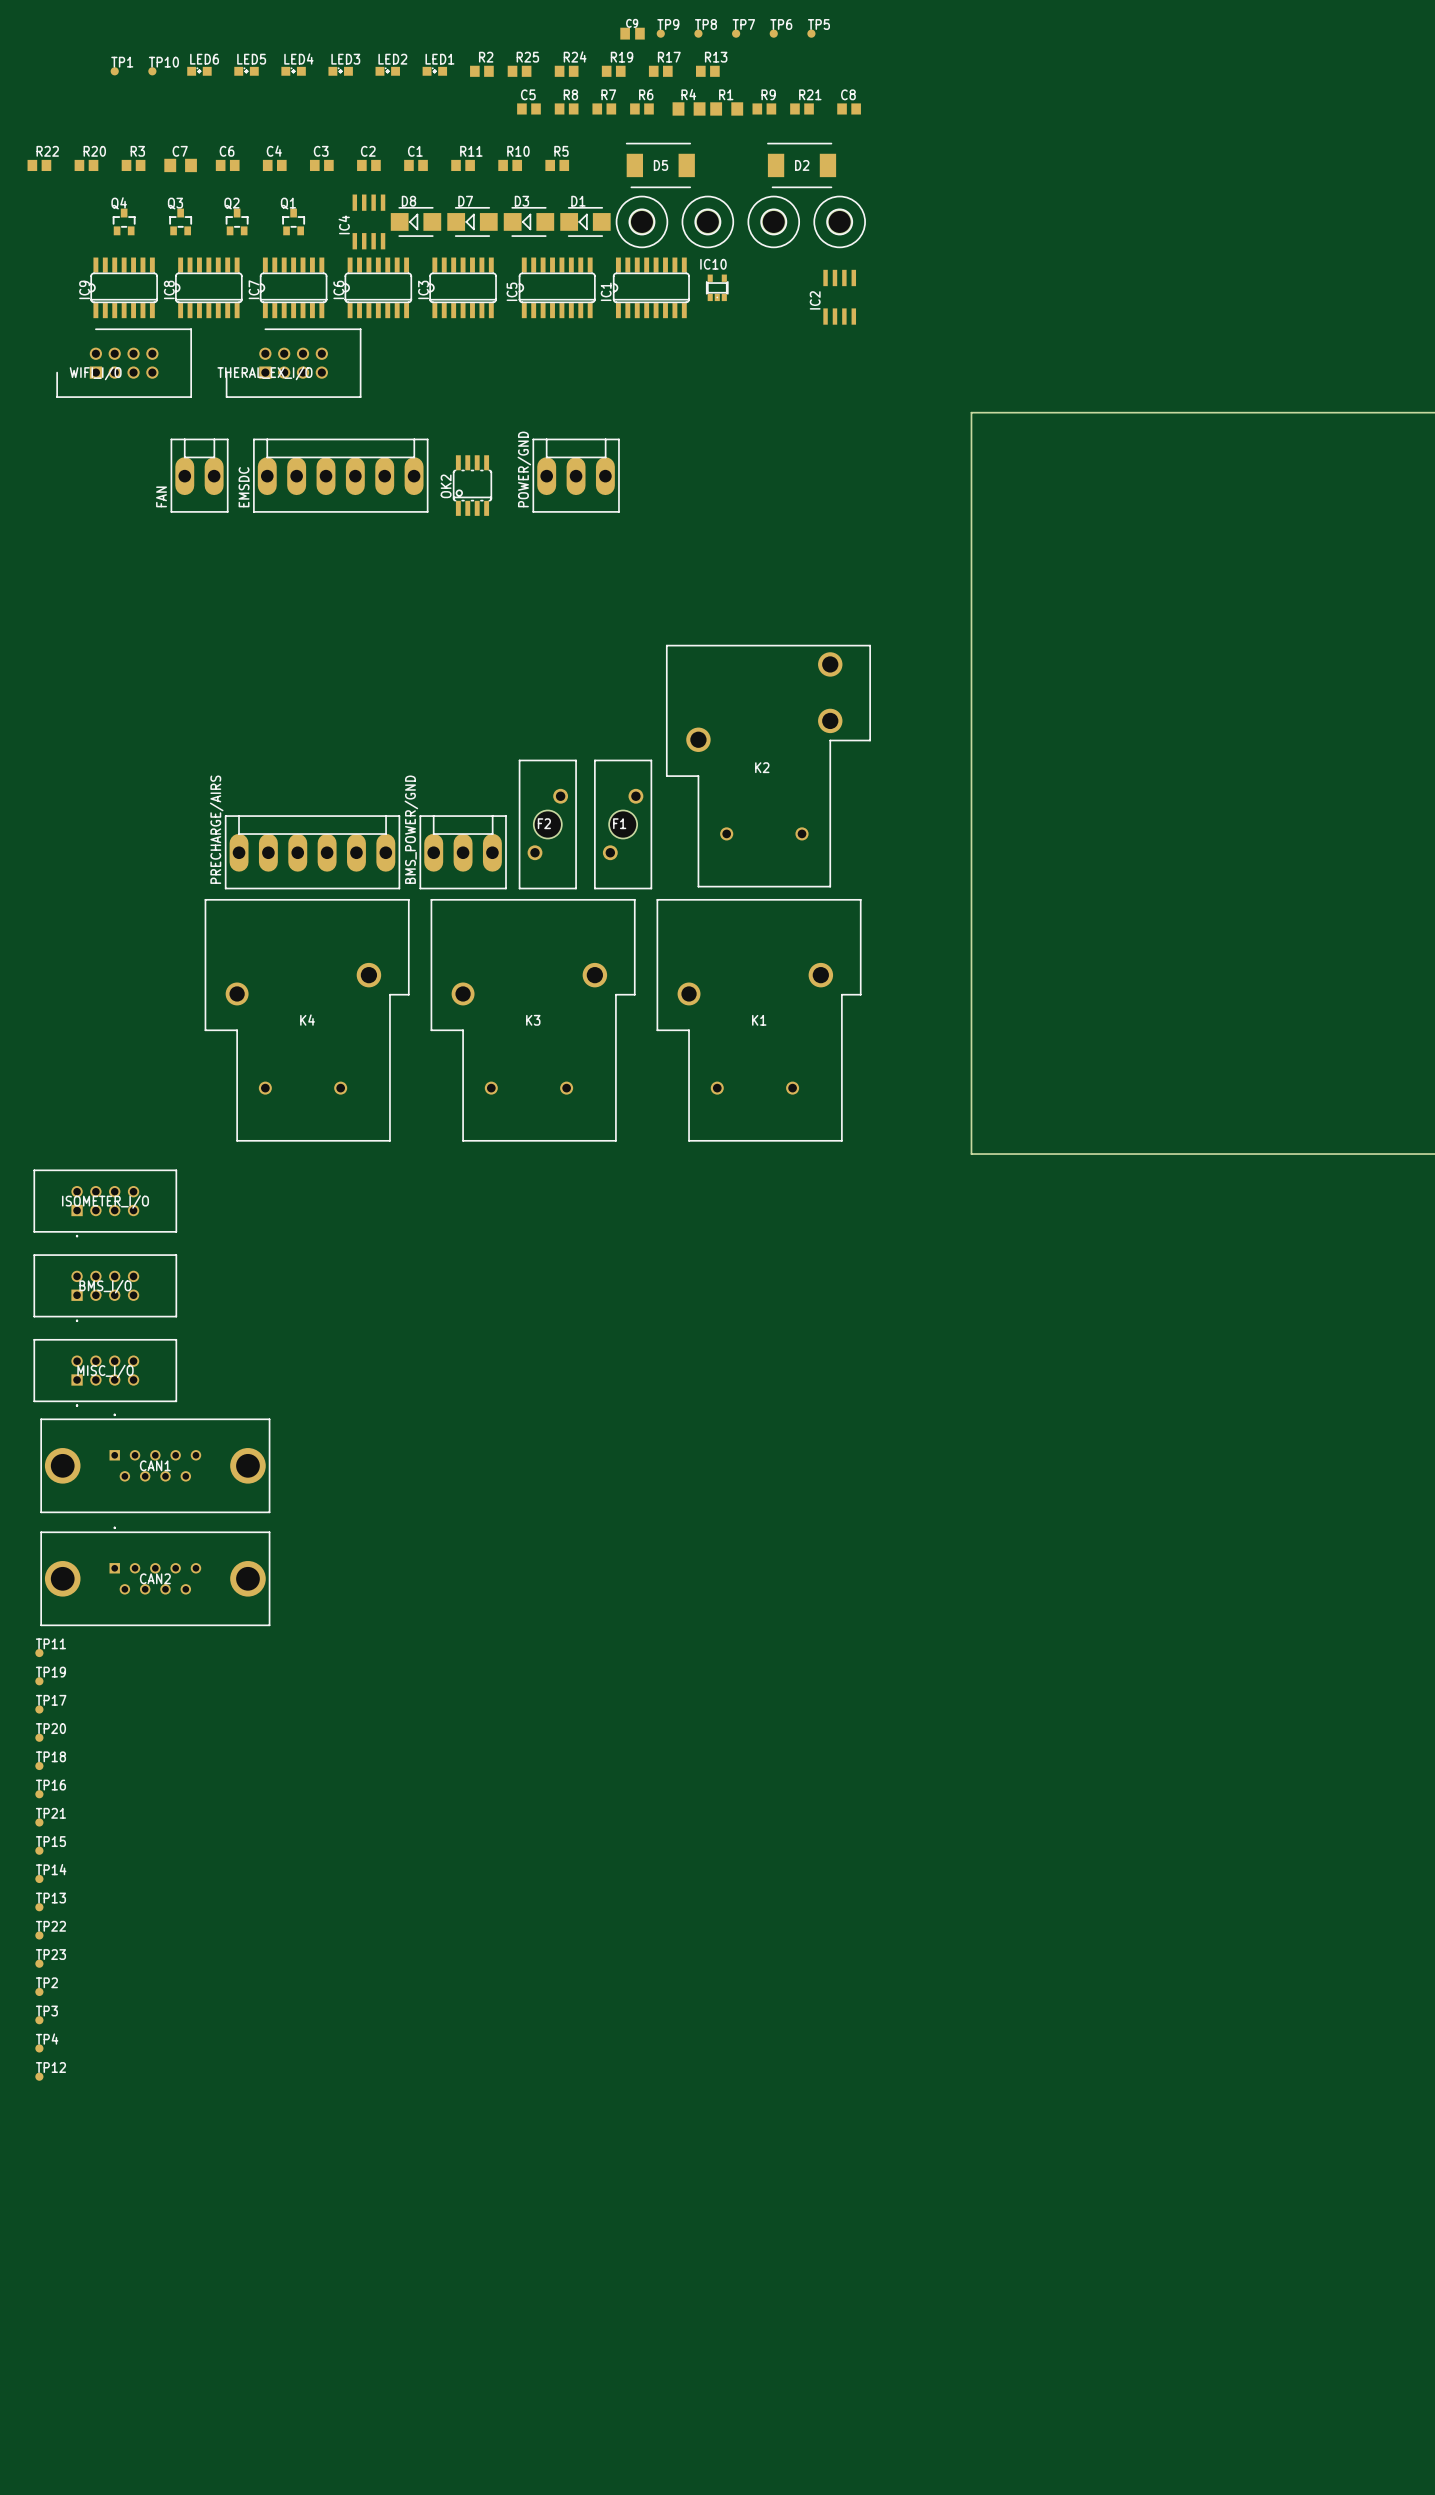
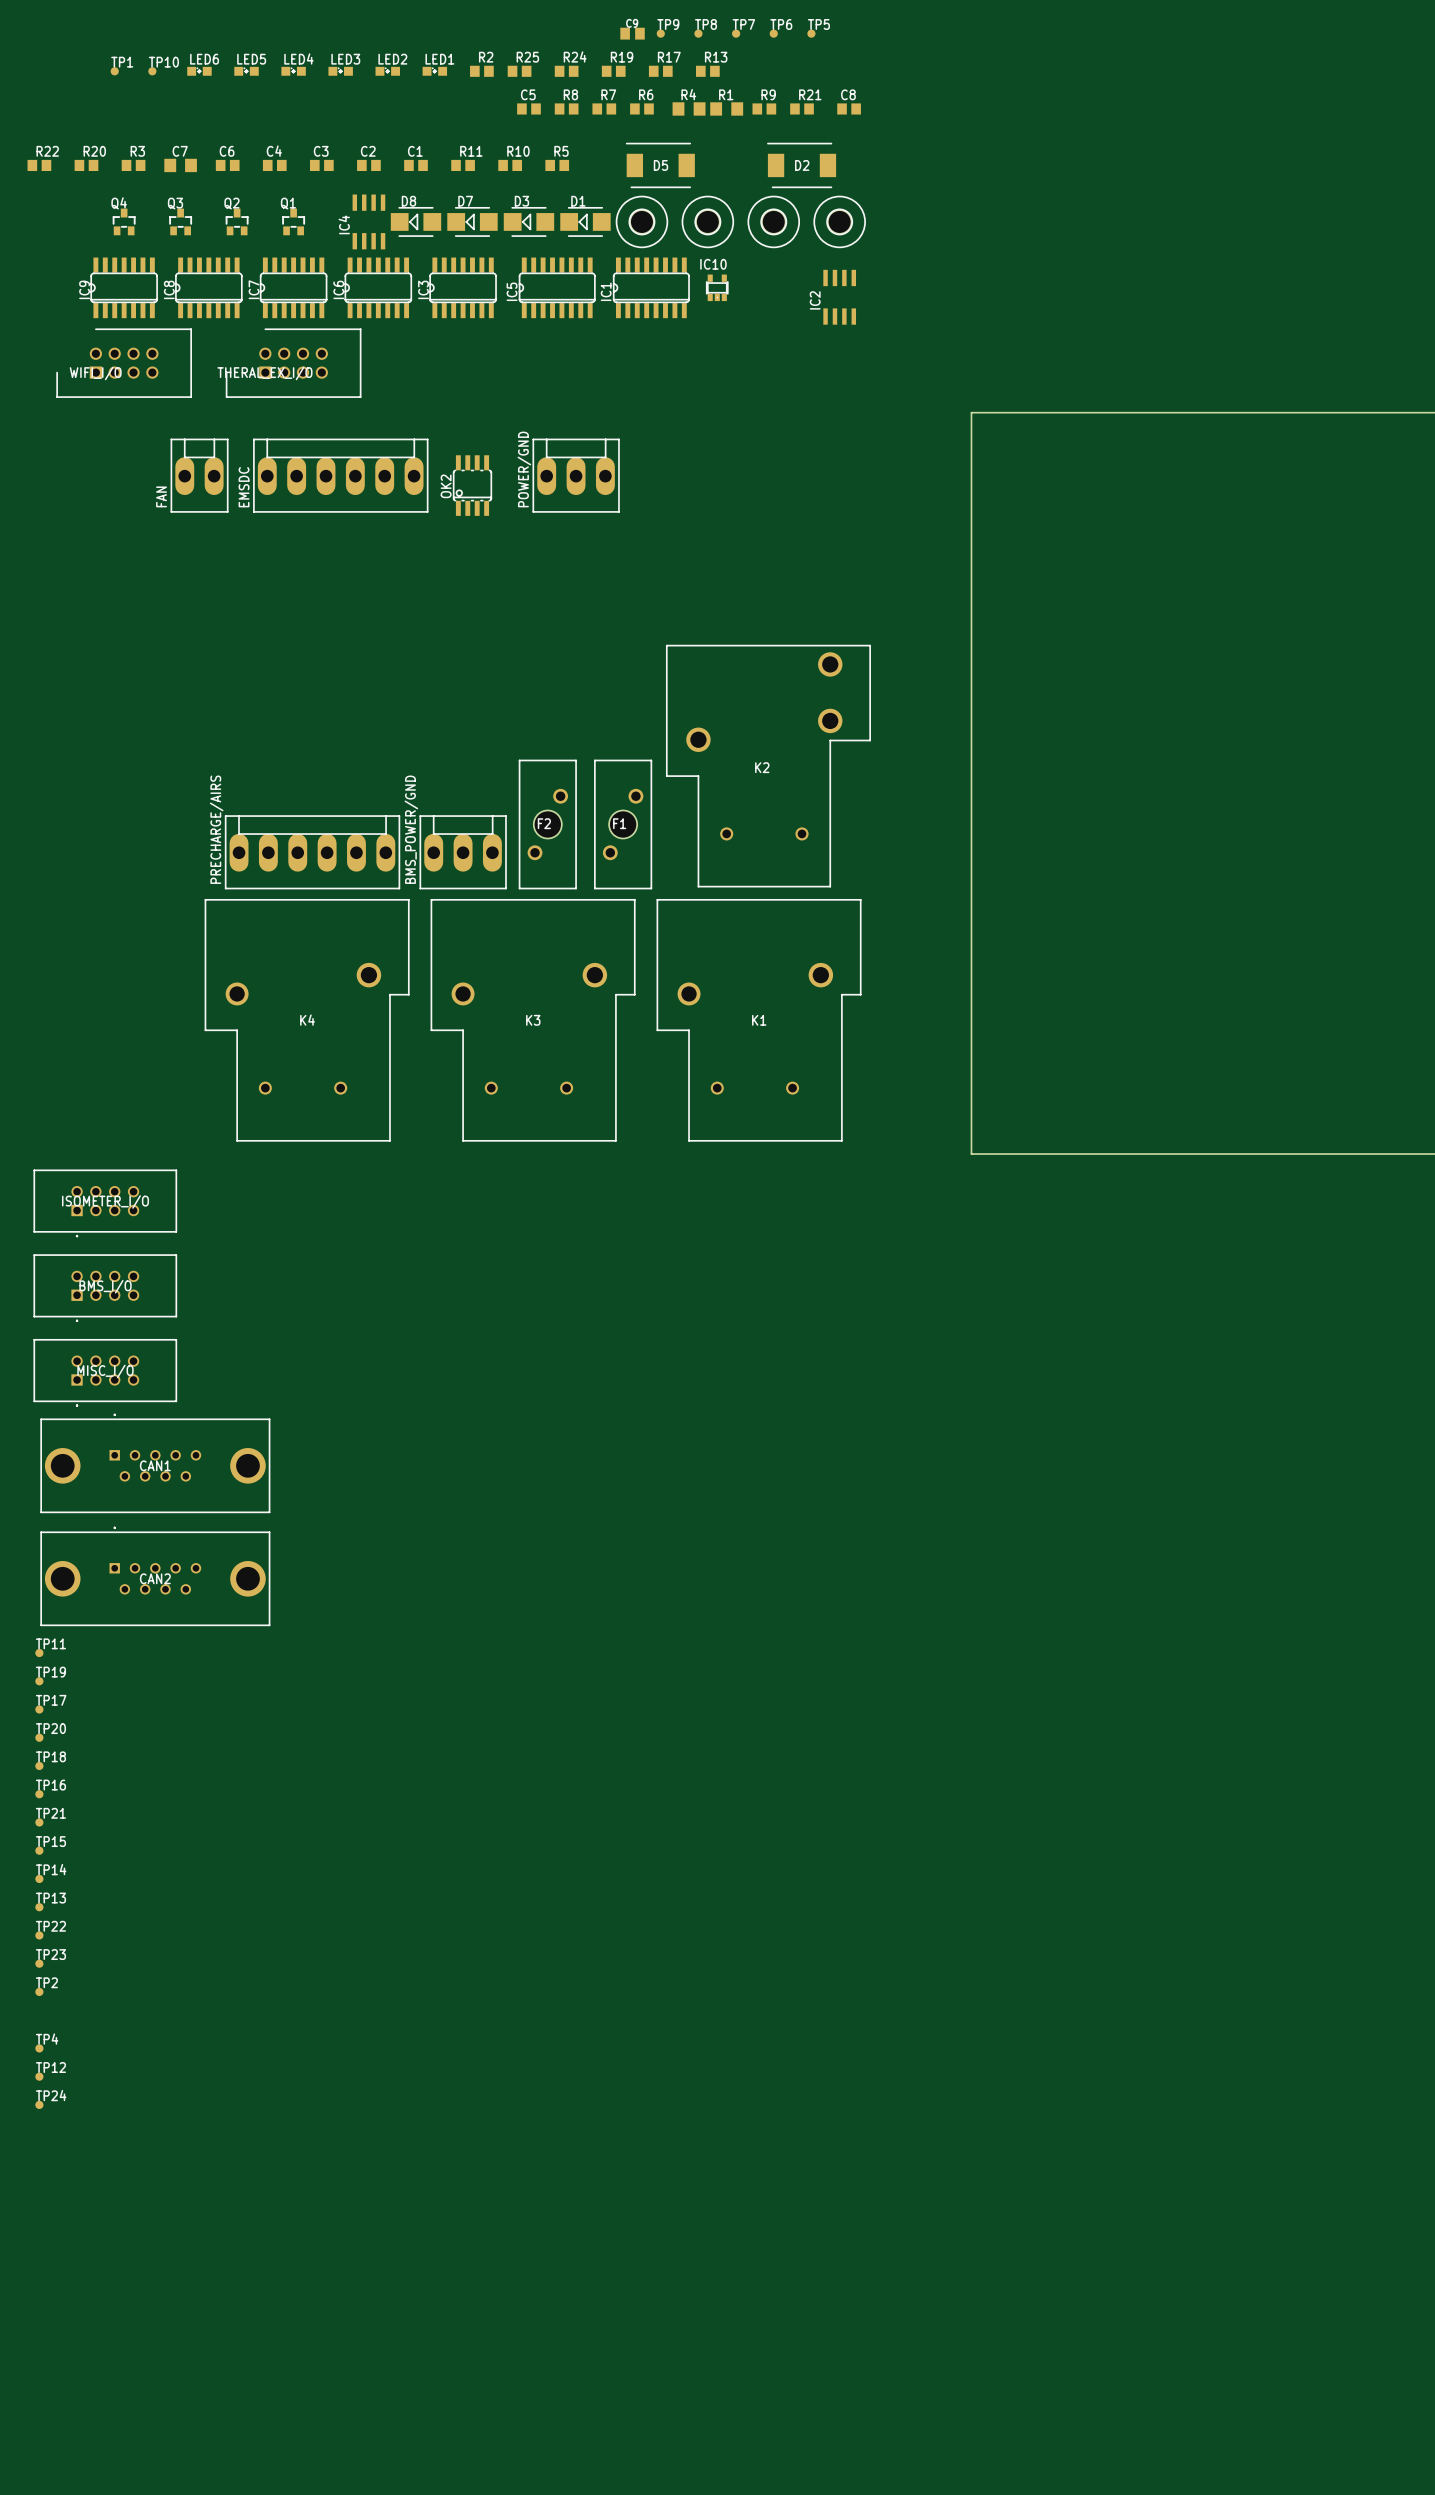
TP3: (39, 2020) -> none
TP24: none -> (39, 2104)

